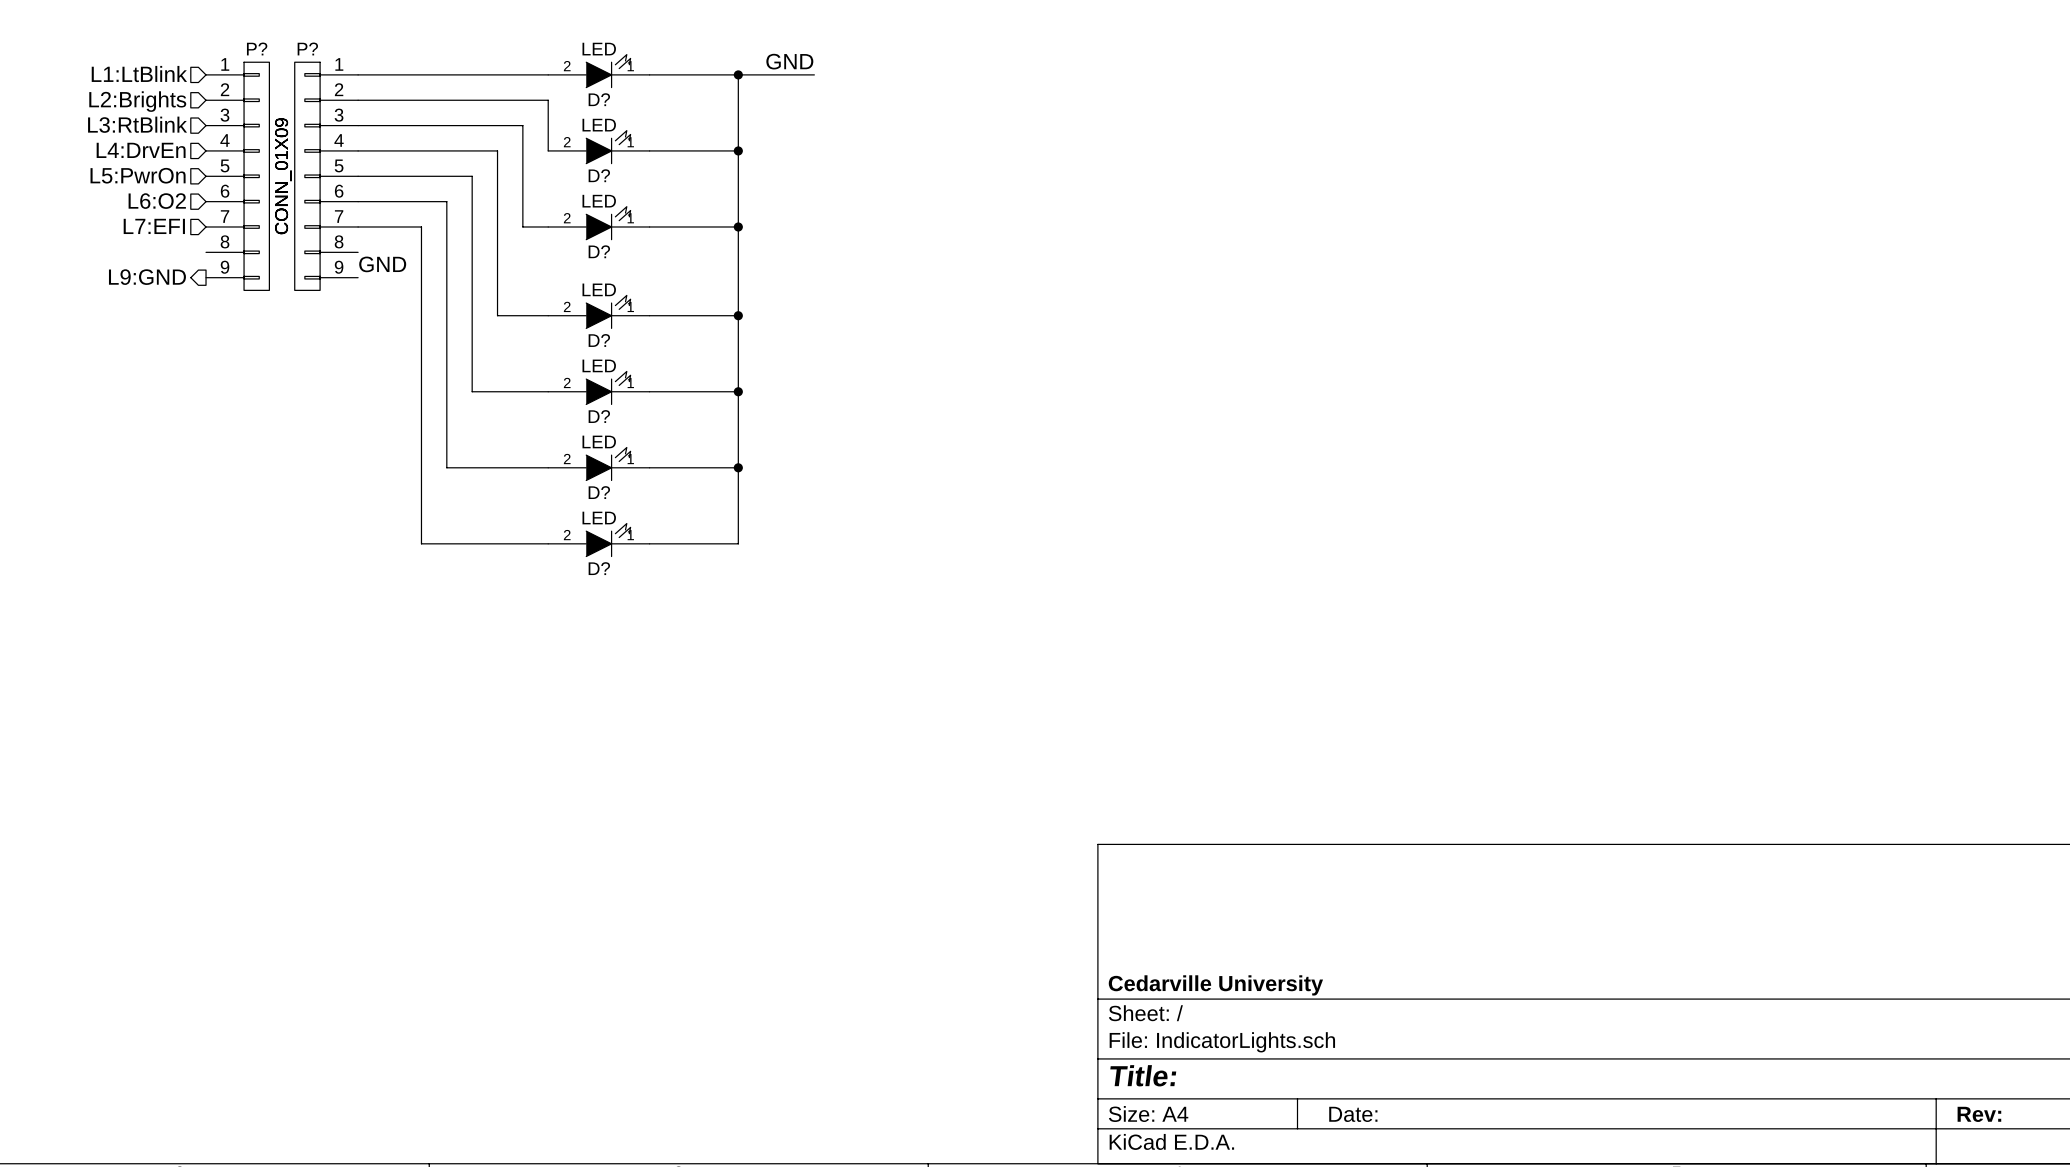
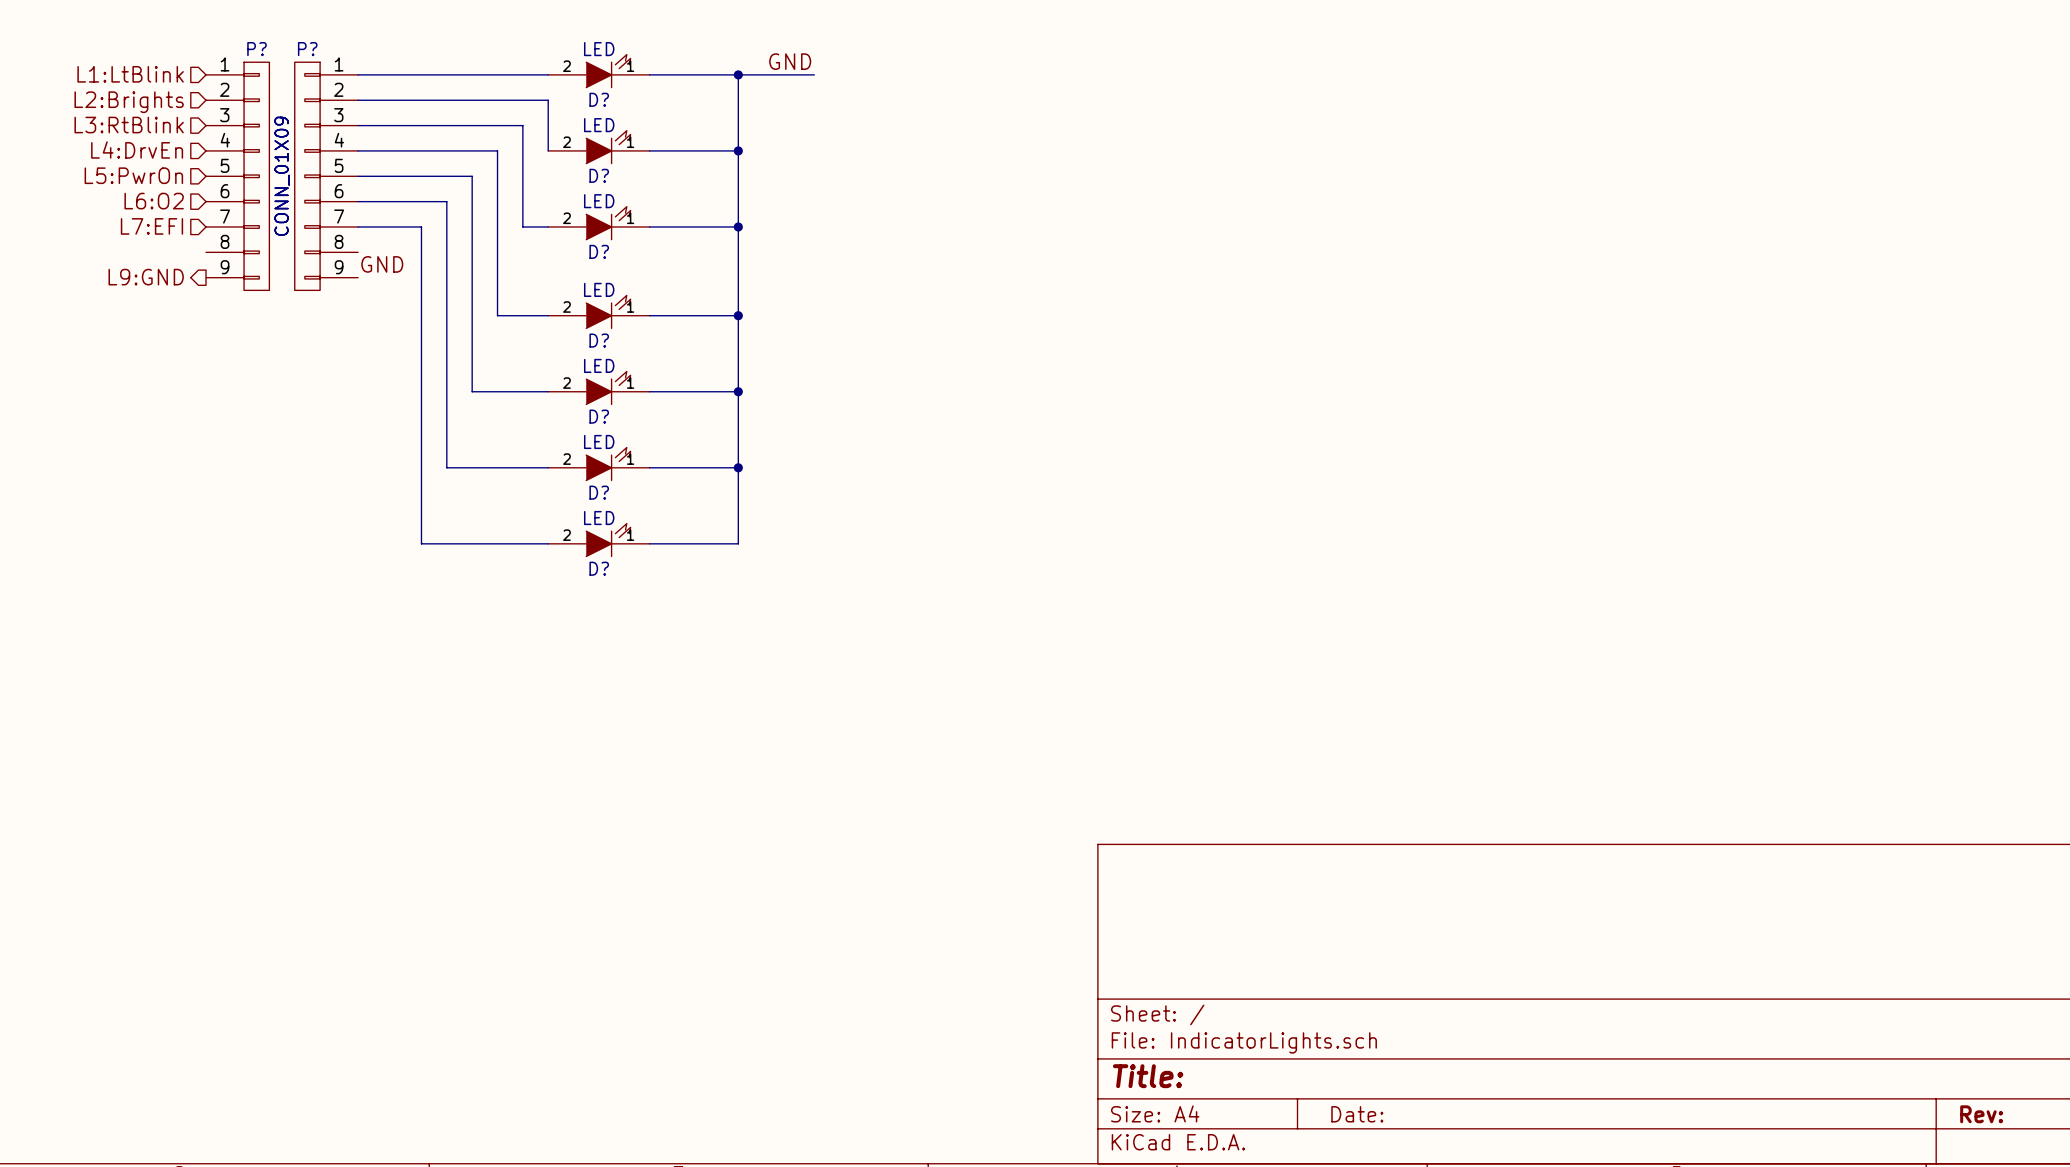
title block: Cedarville University (1215, 985) -> none

